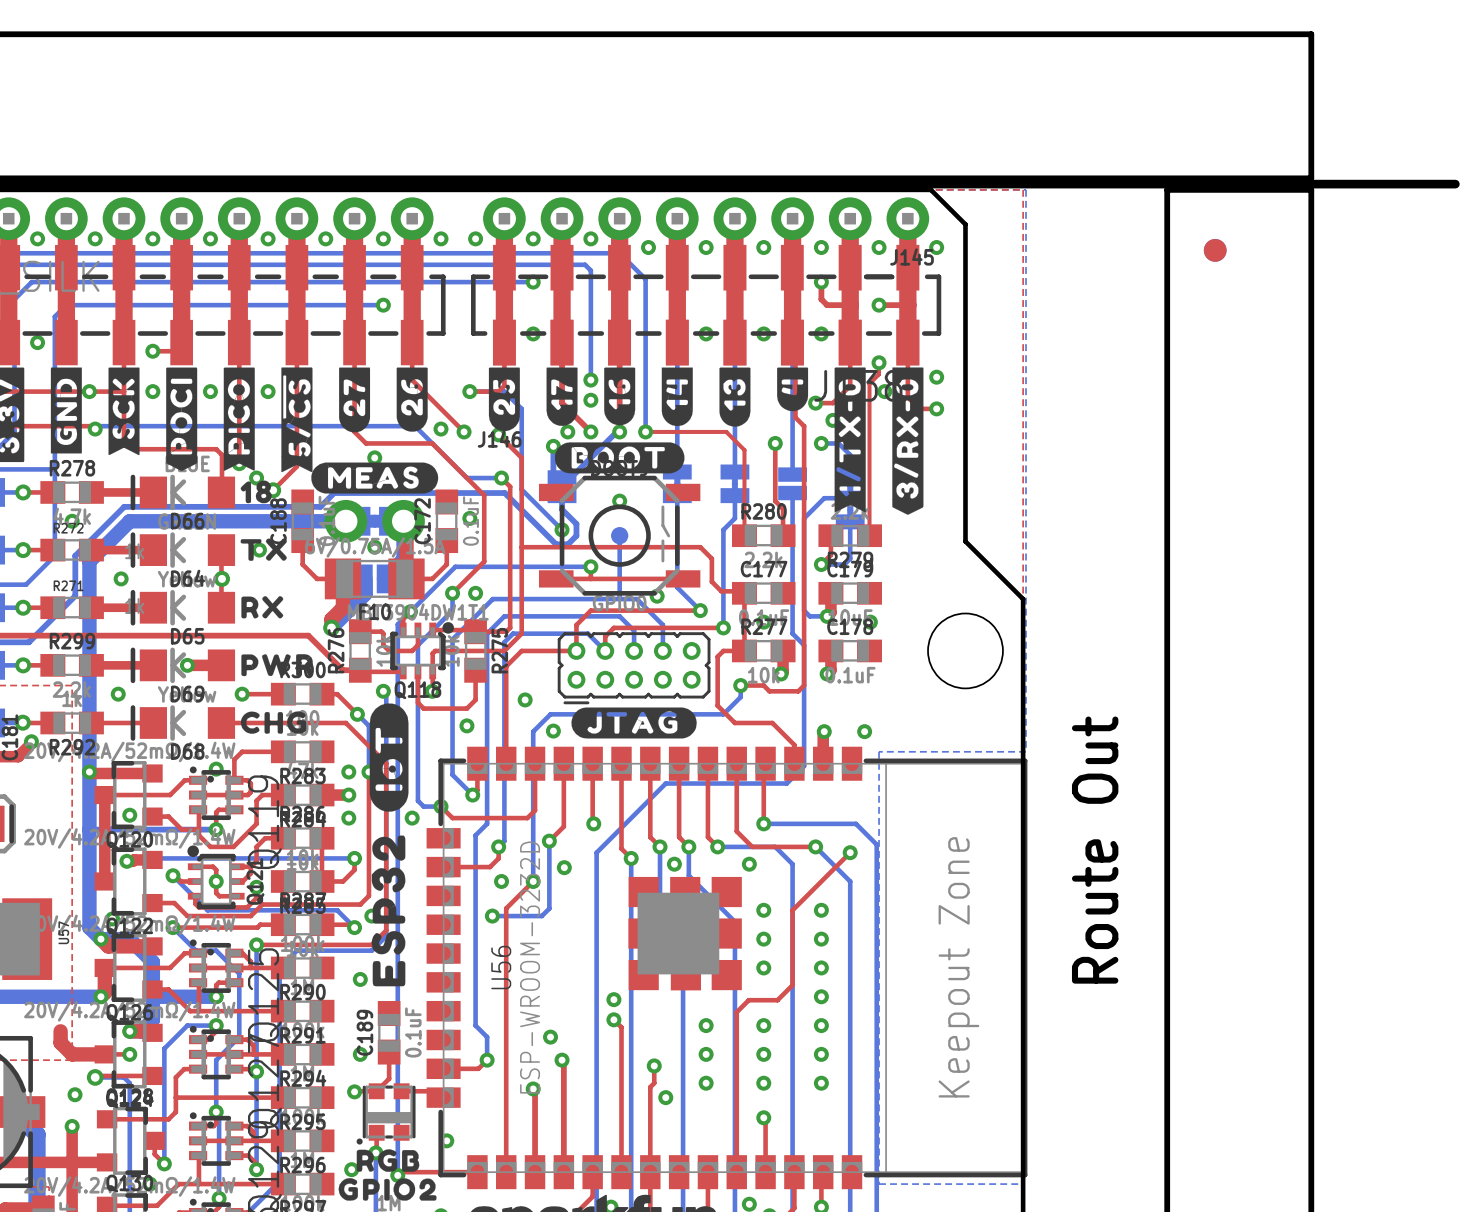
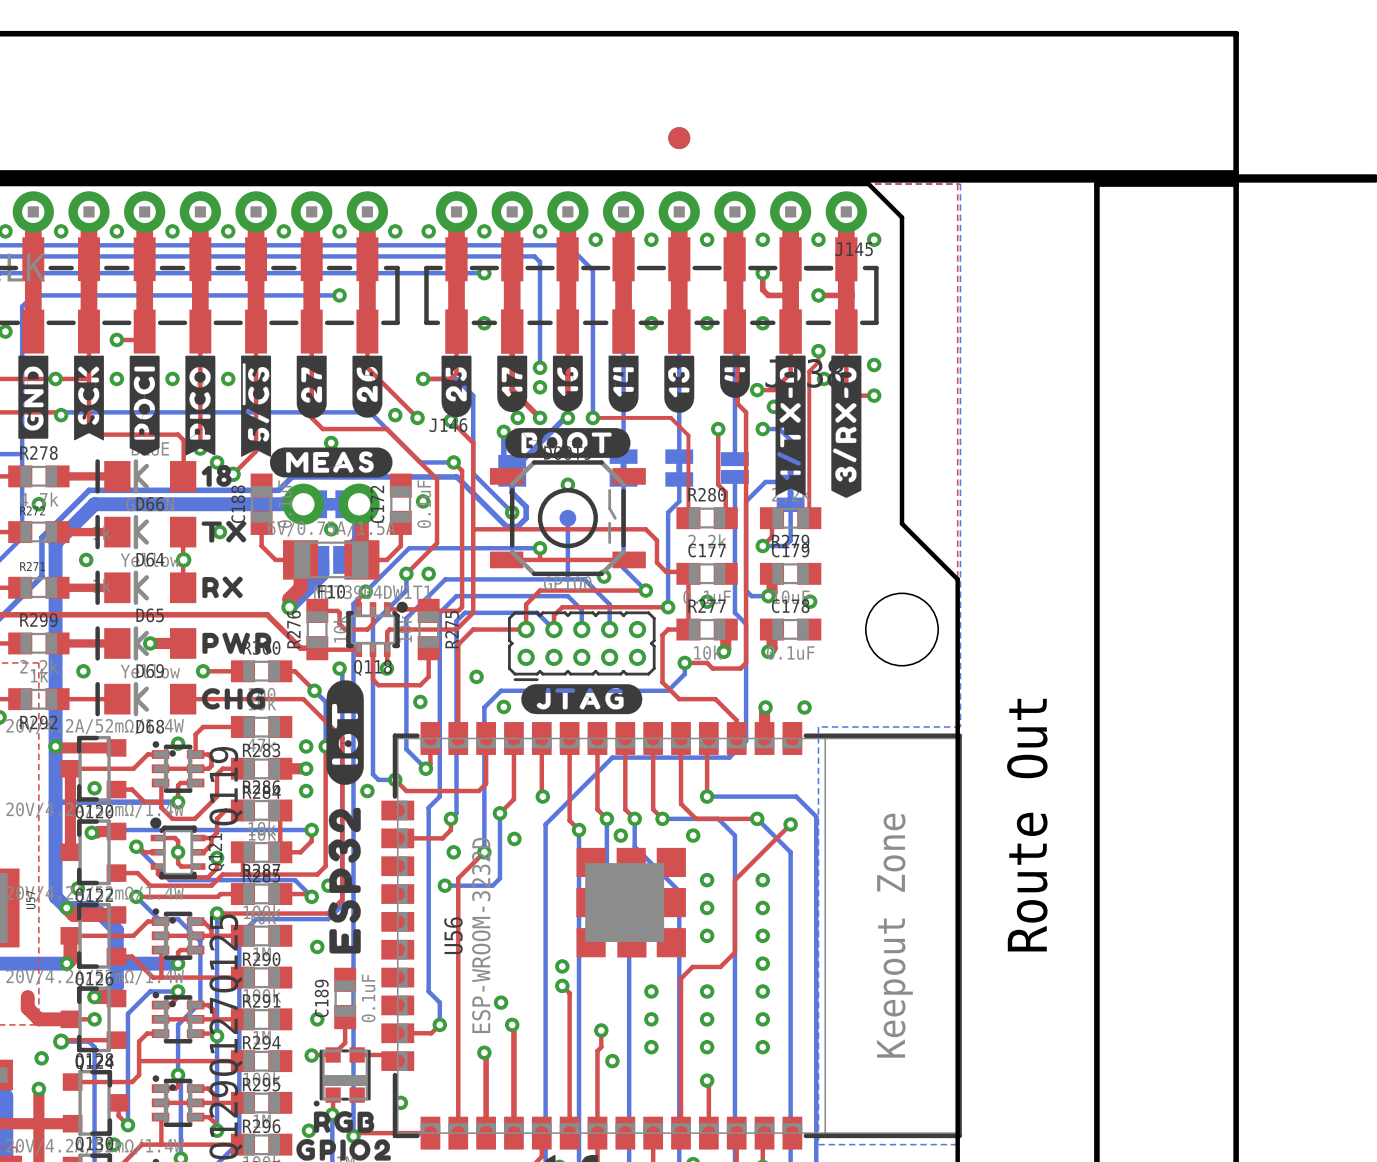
part position: (1215, 250) -> (679, 138)

